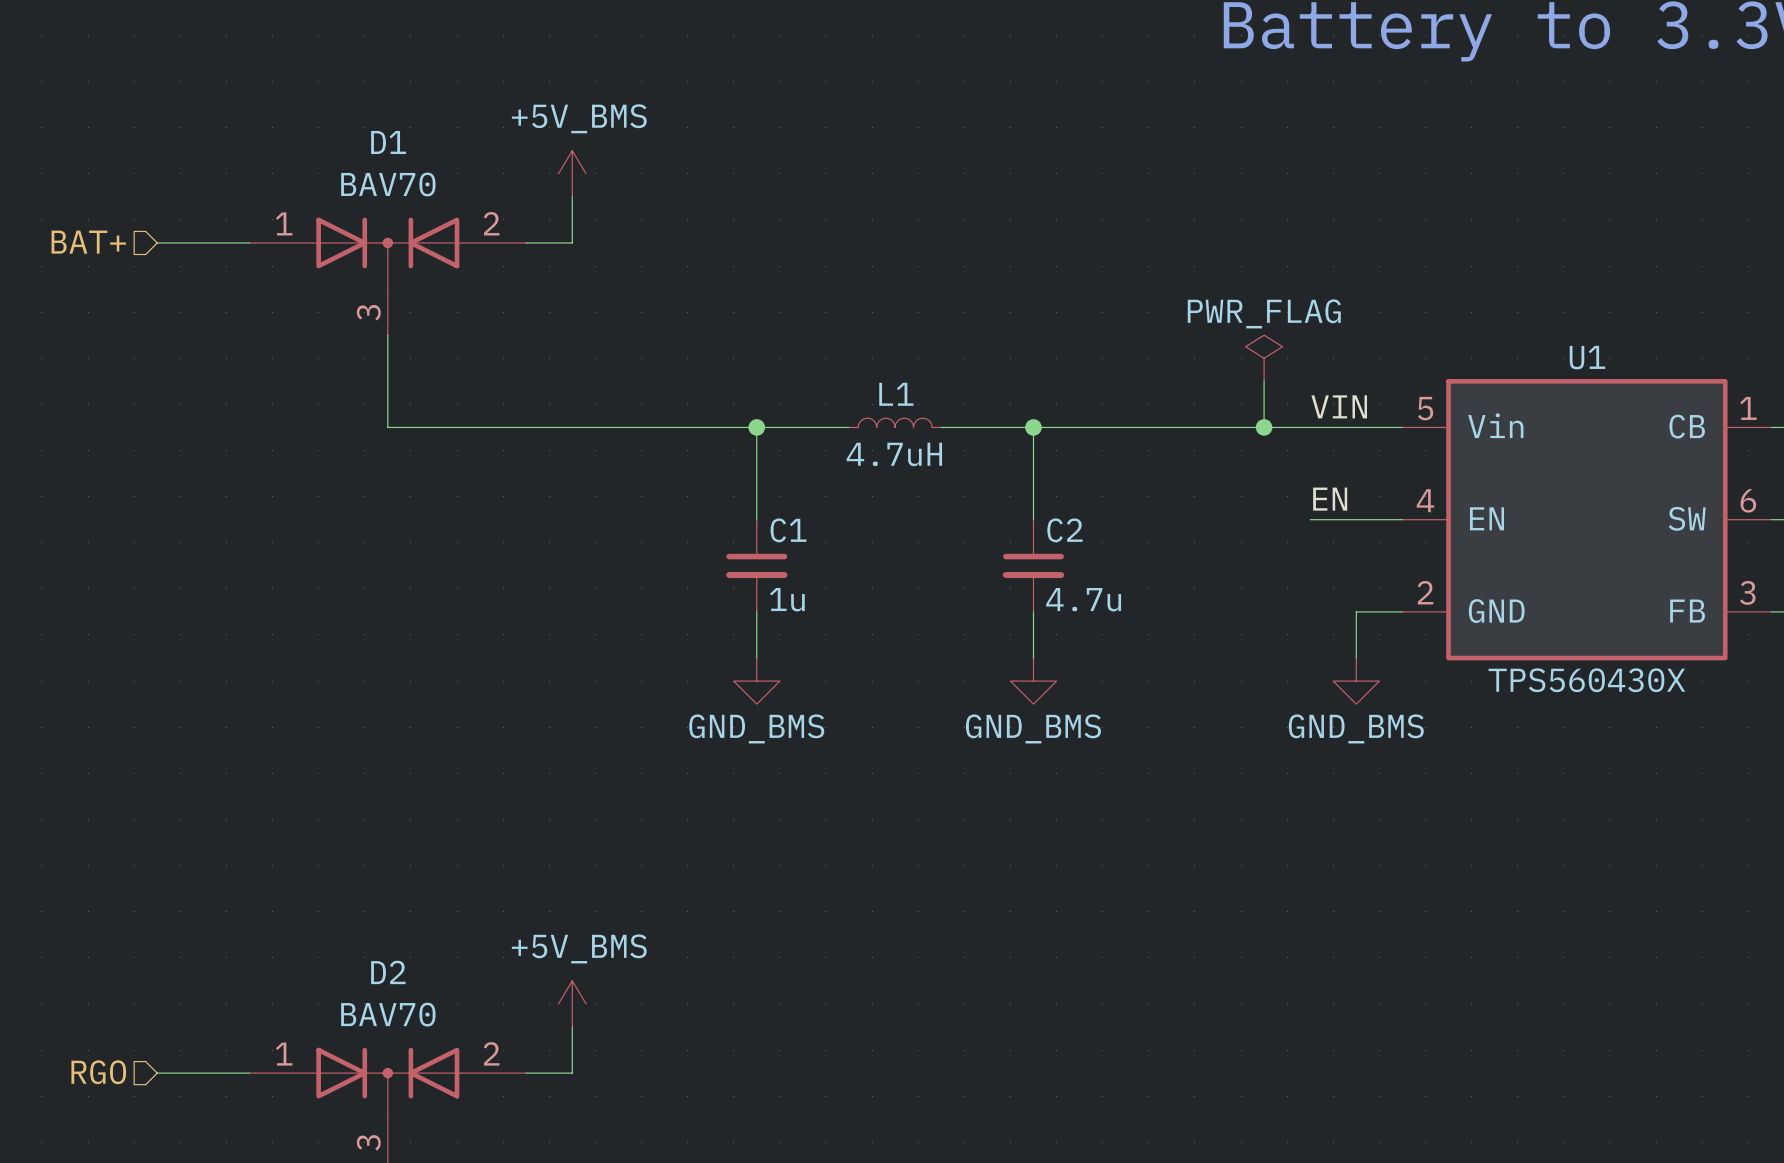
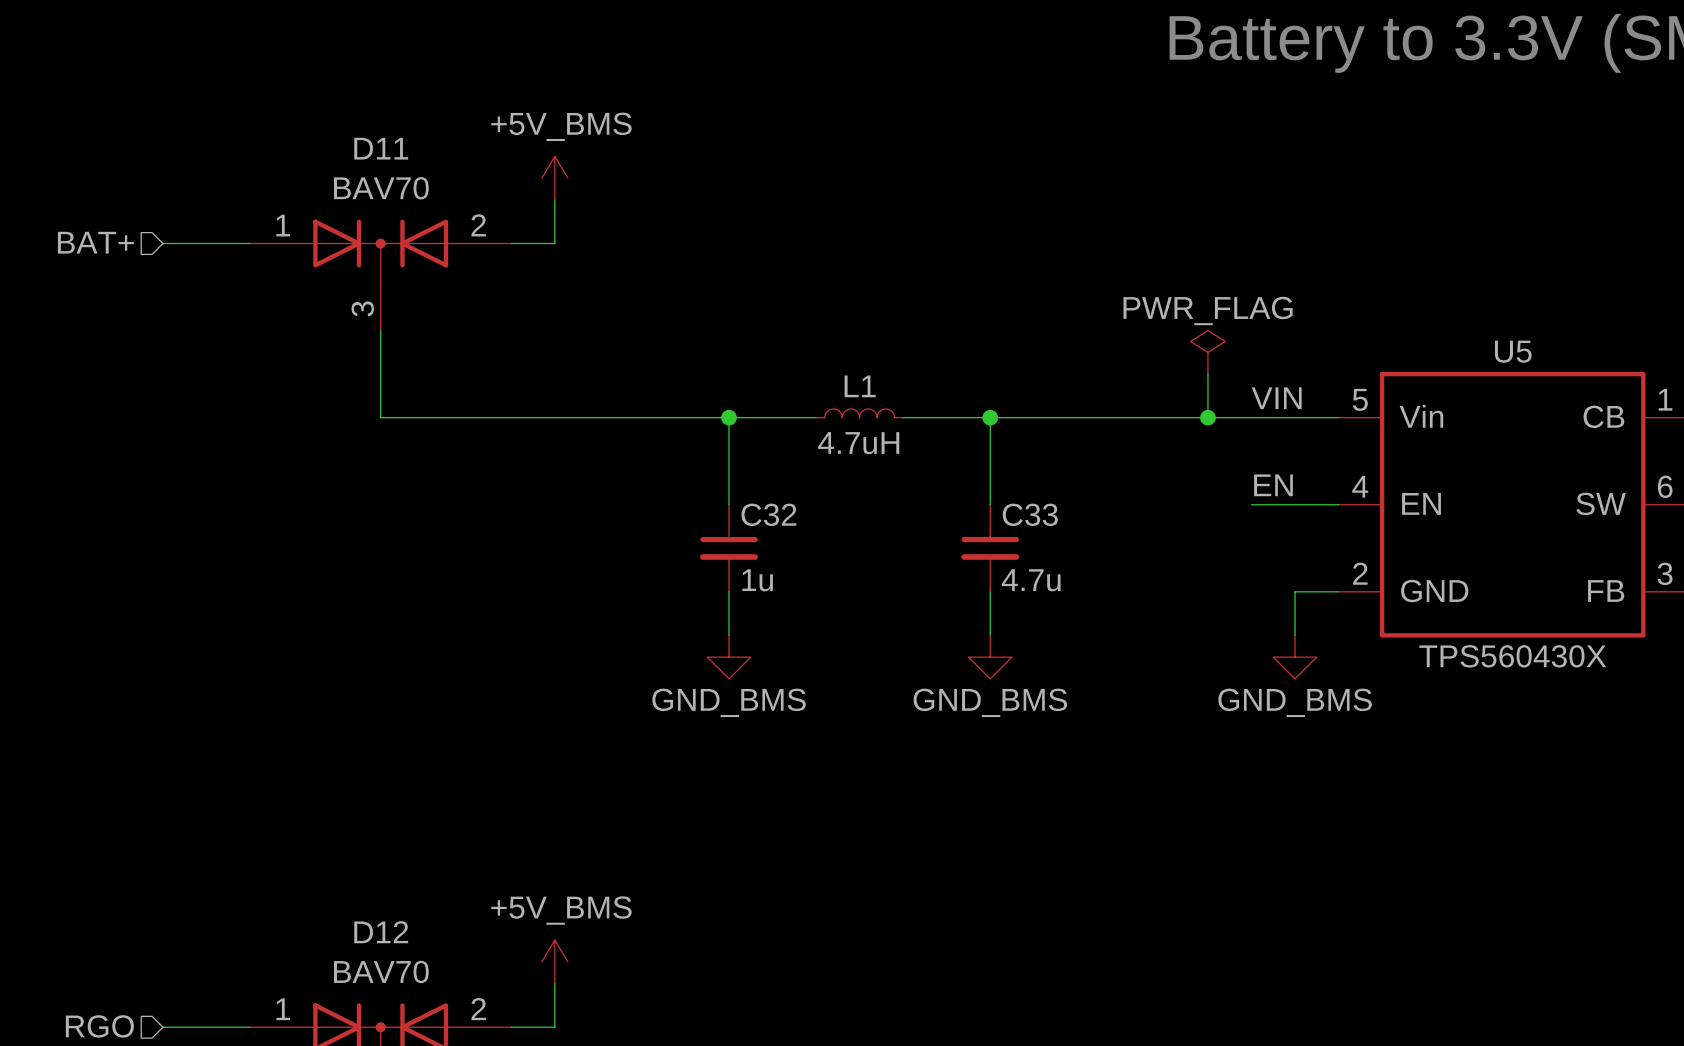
D1 name: D1 (388, 142) -> D11 (381, 148)
U1 name: U1 (1587, 357) -> U5 (1513, 351)
C1 name: C1 (788, 530) -> C32 (768, 514)
C2 name: C2 (1064, 530) -> C33 (1030, 514)
D2 name: D2 (388, 972) -> D12 (381, 932)

